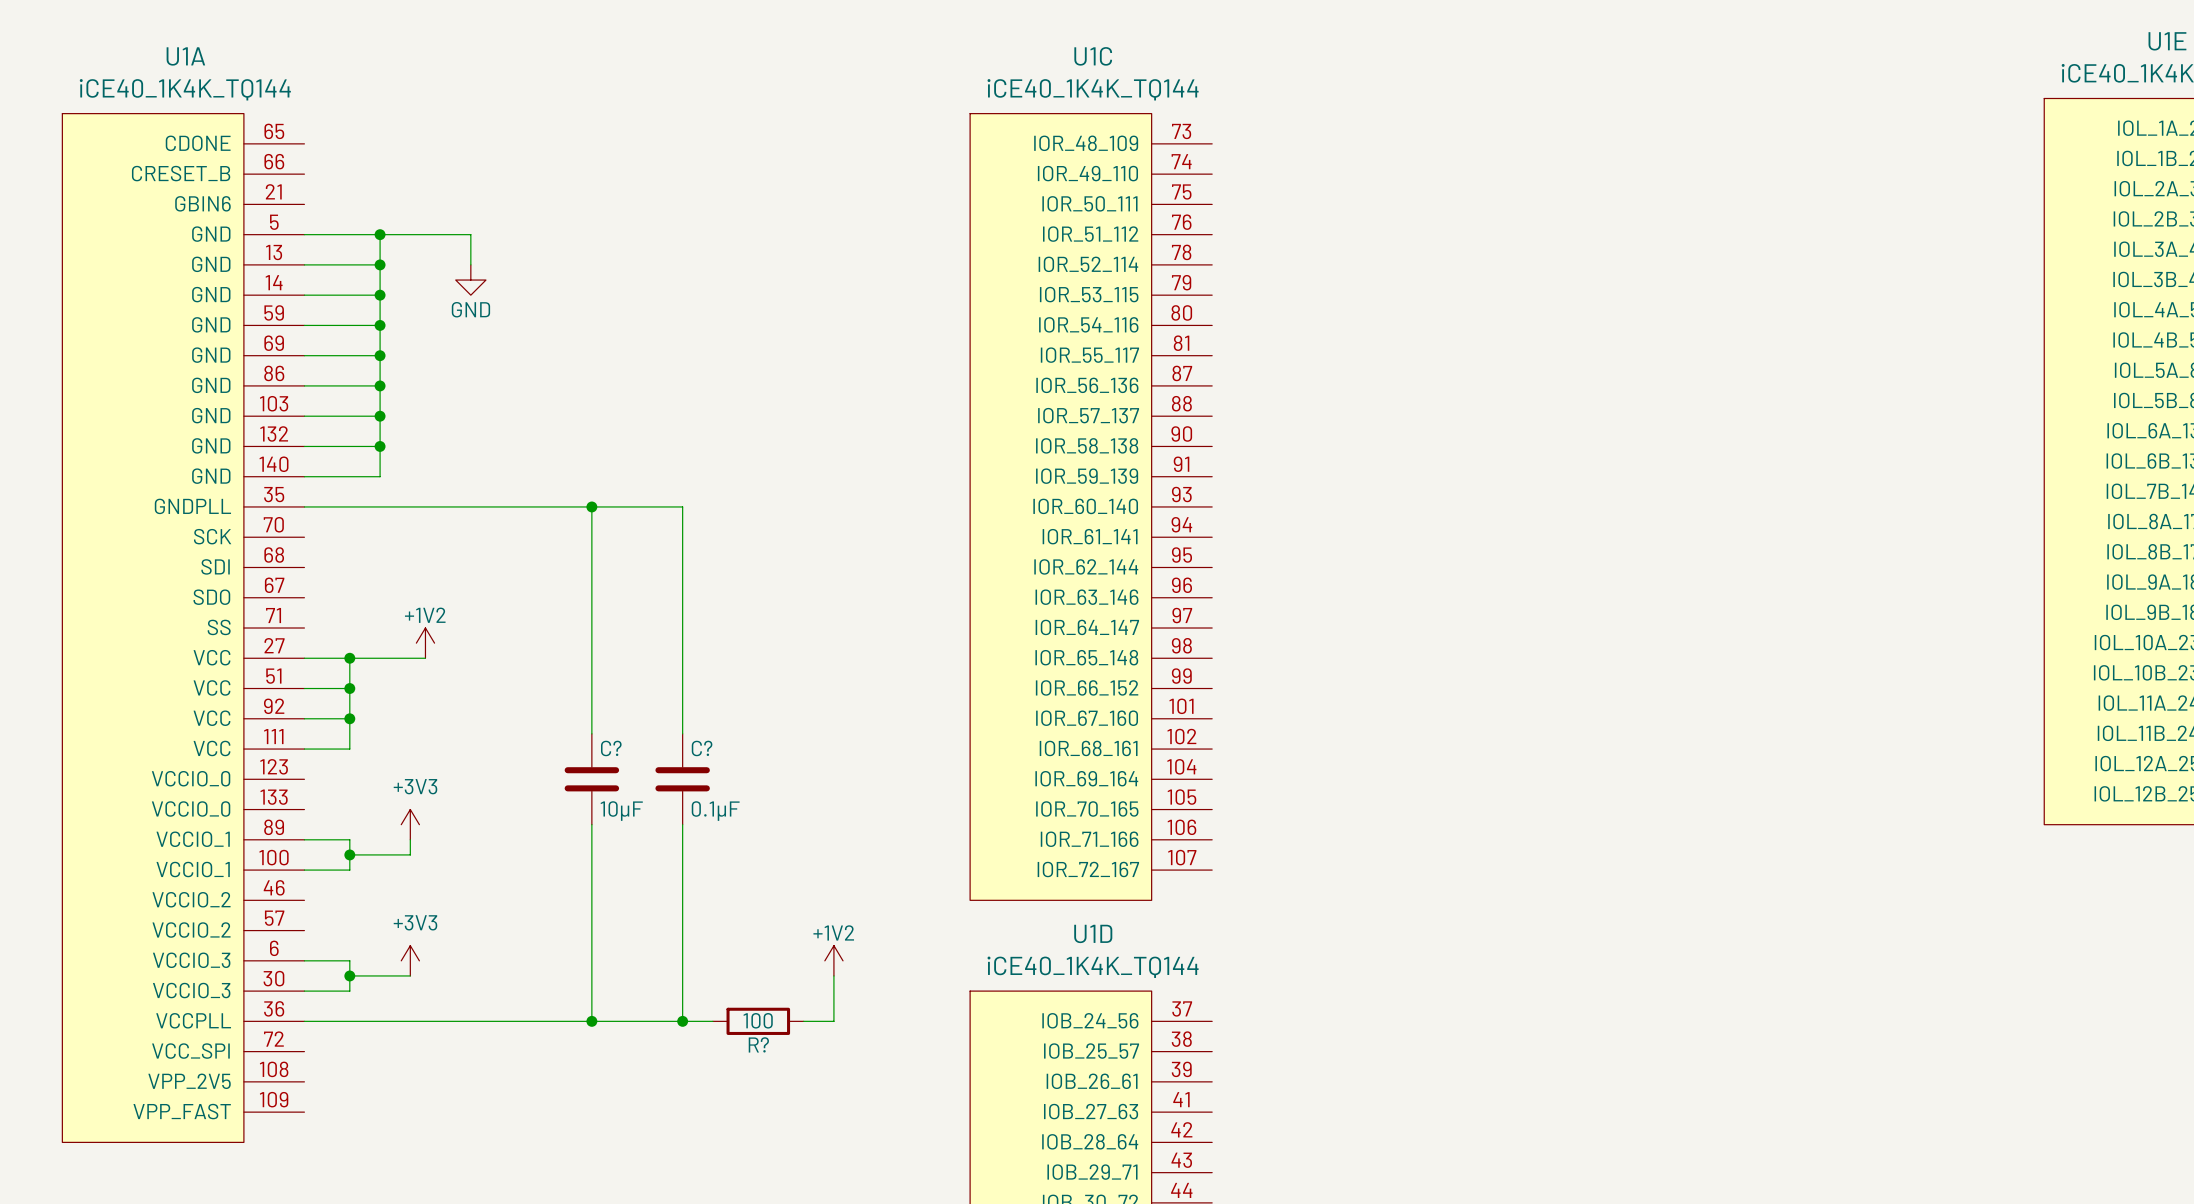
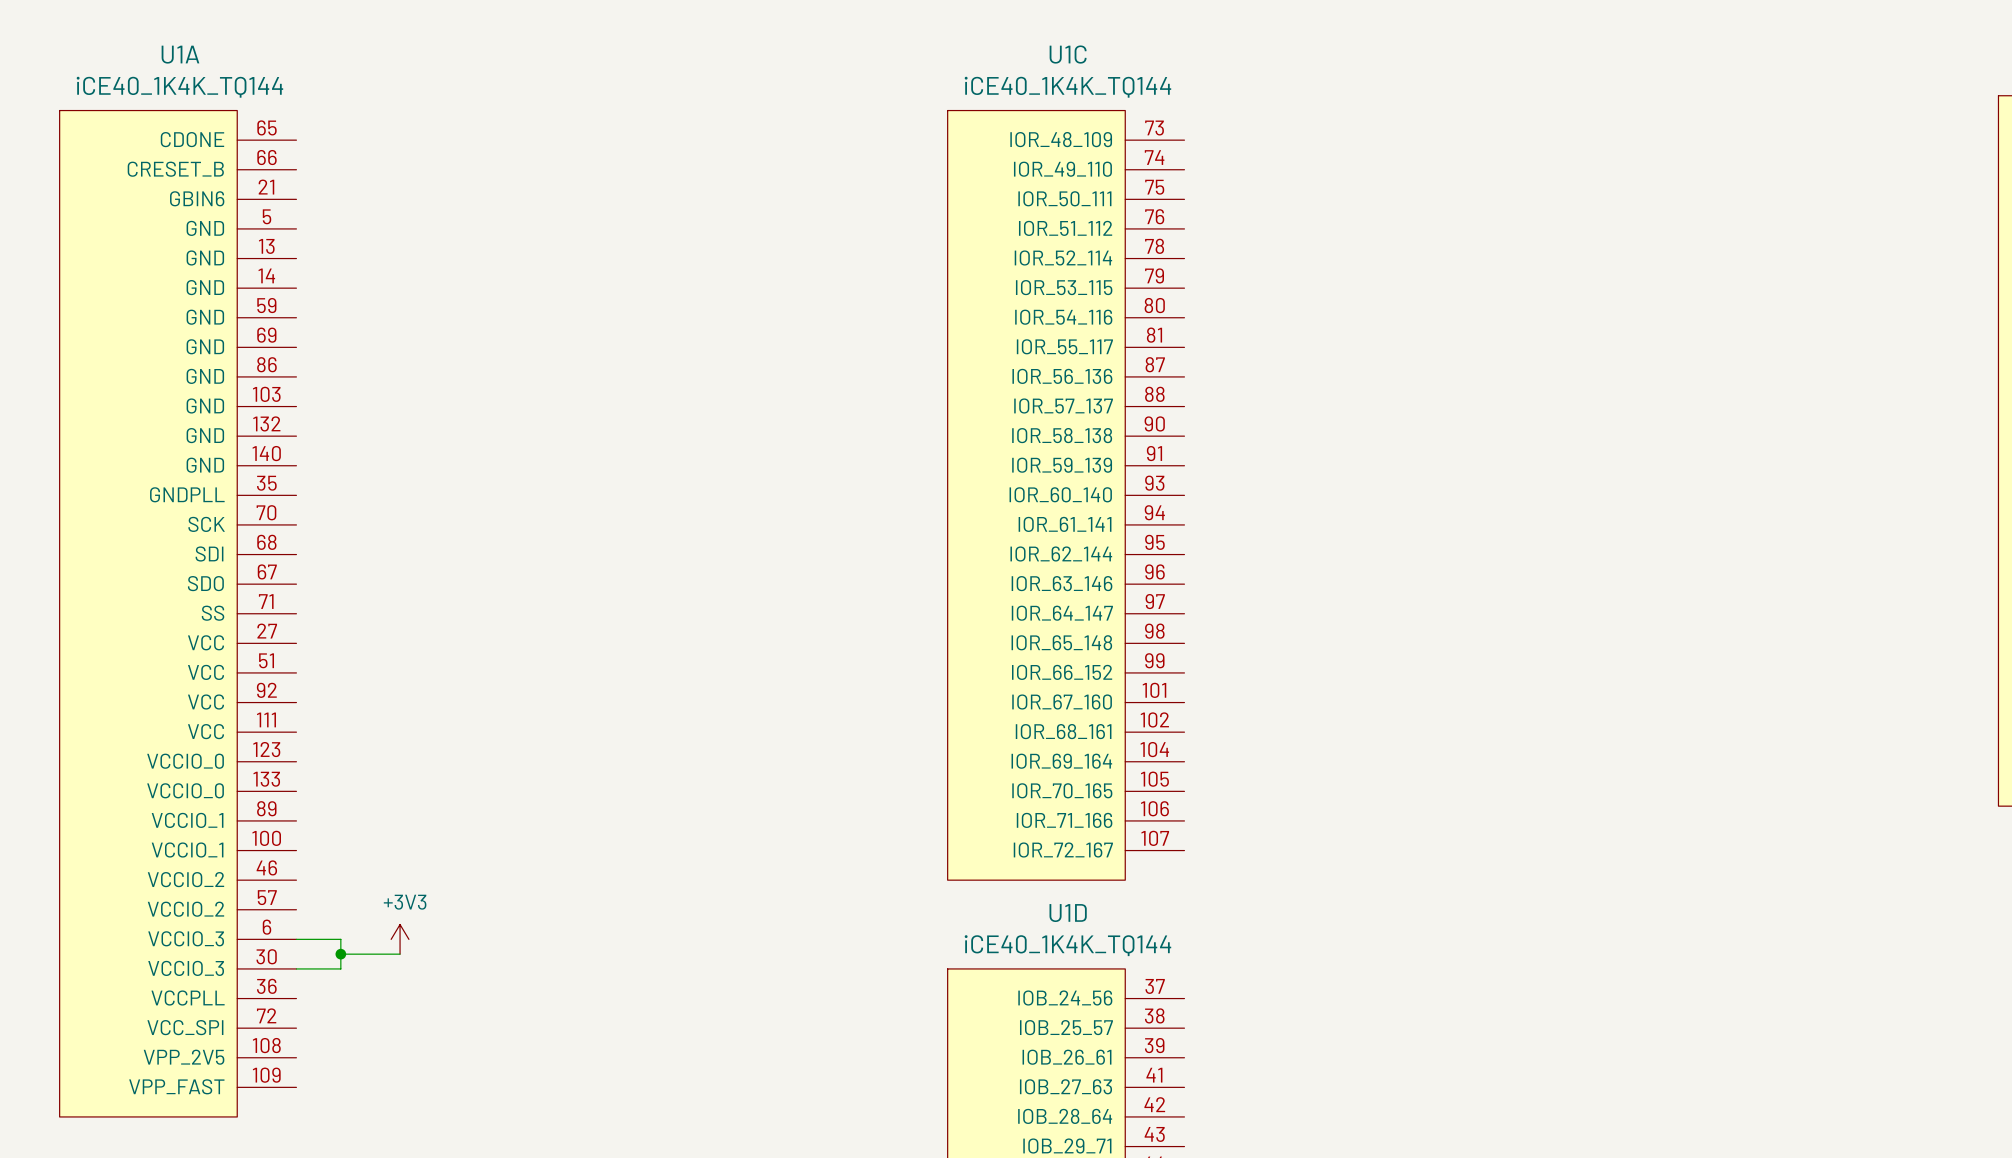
wire: (304, 234) (470, 234) (470, 264) -> none
wire: (380, 234) (380, 476) (304, 476) -> none
junction: (380, 234) -> none
wire: (304, 264) (380, 264) -> none
junction: (380, 264) -> none
power symbol: GND (470, 280) -> none
wire: (304, 295) (380, 295) -> none
junction: (380, 295) -> none
wire: (304, 325) (380, 325) -> none
junction: (380, 325) -> none
wire: (304, 355) (380, 355) -> none
junction: (380, 355) -> none
wire: (304, 385) (380, 385) -> none
junction: (380, 385) -> none
wire: (304, 416) (380, 416) -> none
junction: (380, 416) -> none
wire: (304, 446) (380, 446) -> none
junction: (380, 446) -> none
wire: (304, 506) (682, 506) (682, 733) -> none
wire: (591, 506) (591, 733) -> none
junction: (591, 506) -> none
power symbol: +1V2 (425, 643) -> none
wire: (304, 658) (425, 658) -> none
wire: (349, 658) (349, 749) (304, 749) -> none
junction: (349, 658) -> none
wire: (304, 688) (349, 688) -> none
junction: (349, 688) -> none
wire: (304, 718) (349, 718) -> none
junction: (349, 718) -> none
C?: 10µF (591, 779) -> none
C?: 0.1µF (682, 779) -> none
power symbol: +3V3 (410, 824) -> none
wire: (591, 824) (591, 1021) -> none
wire: (682, 824) (682, 1021) -> none
wire: (304, 839) (349, 839) (349, 870) (304, 870) -> none
wire: (410, 839) (410, 854) (349, 854) -> none
junction: (349, 854) -> none
power symbol: +1V2 (833, 960) -> none
wire: (833, 975) (833, 1021) (803, 1021) -> none
wire: (304, 1021) (712, 1021) -> none
junction: (591, 1021) -> none
junction: (682, 1021) -> none
R?: 100 (758, 1021) -> none

